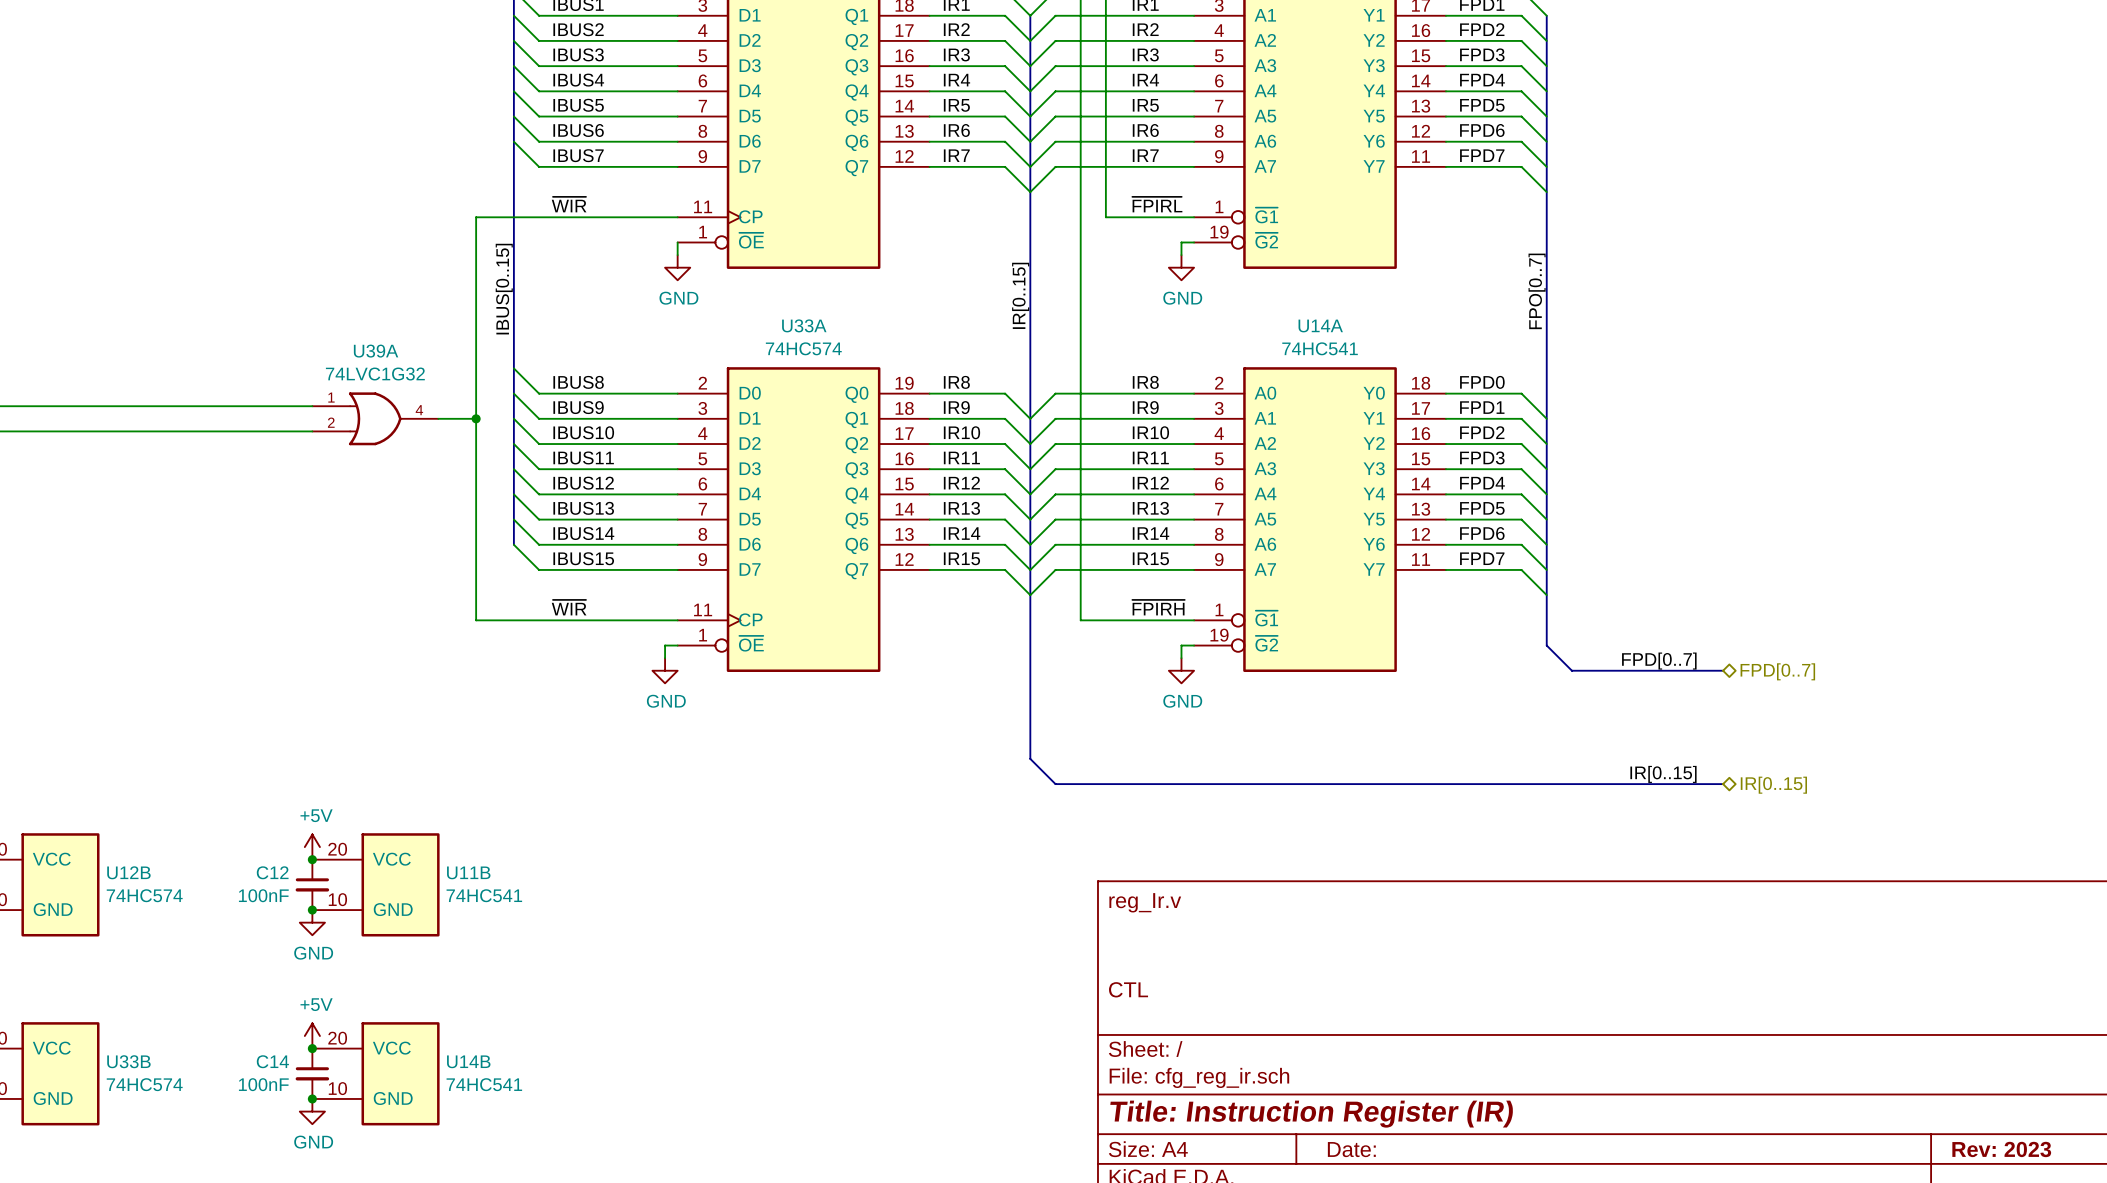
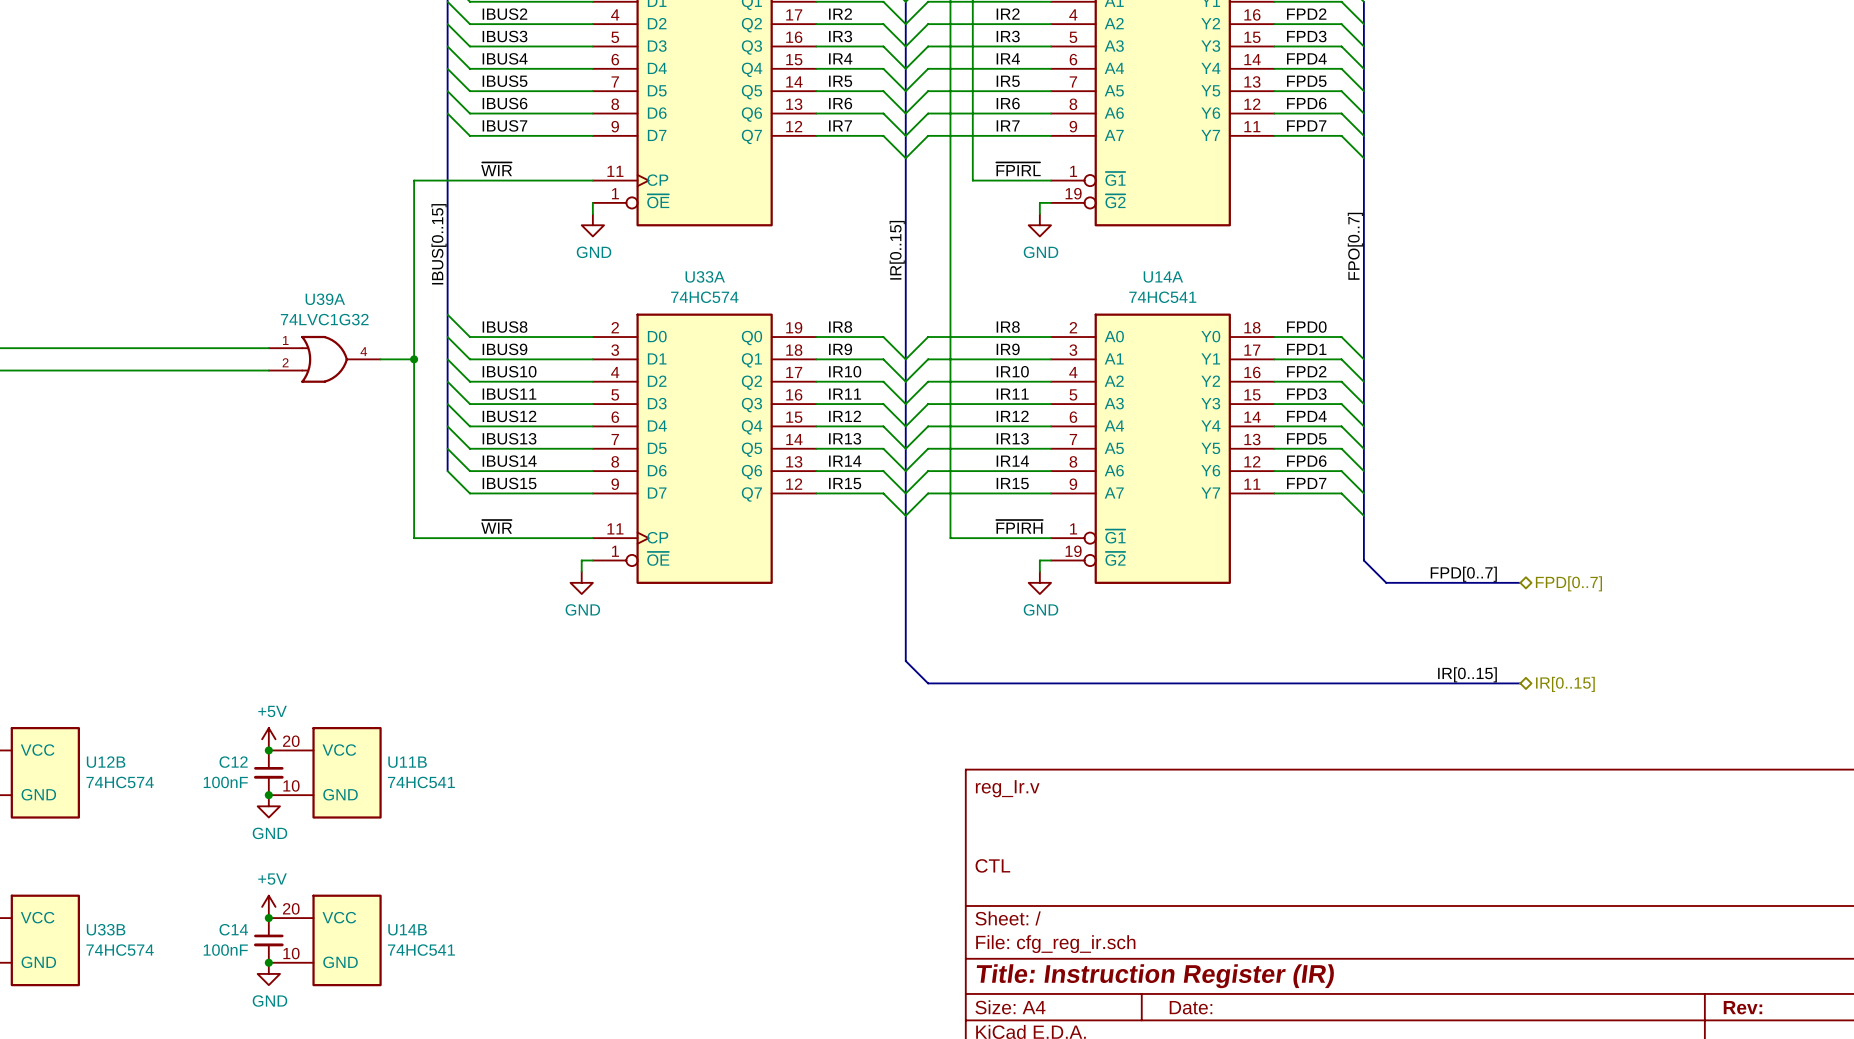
title block: Rev: 2023 (2001, 1149) -> Rev: (1742, 1007)

